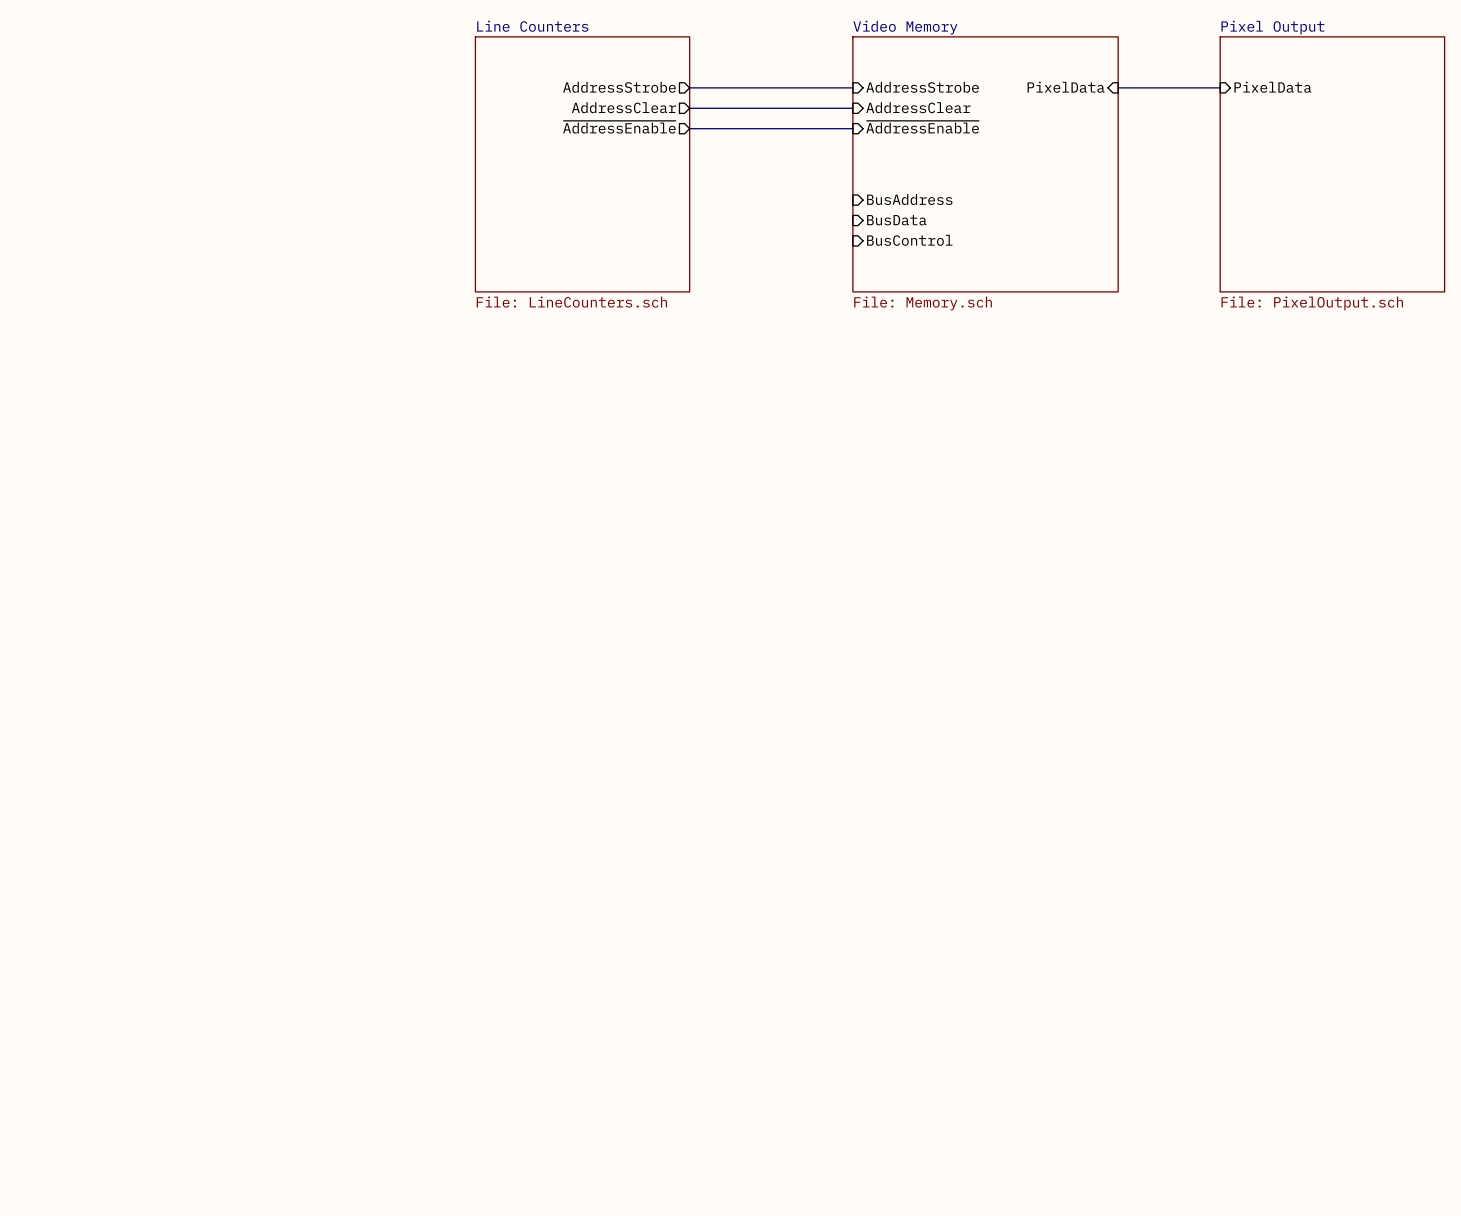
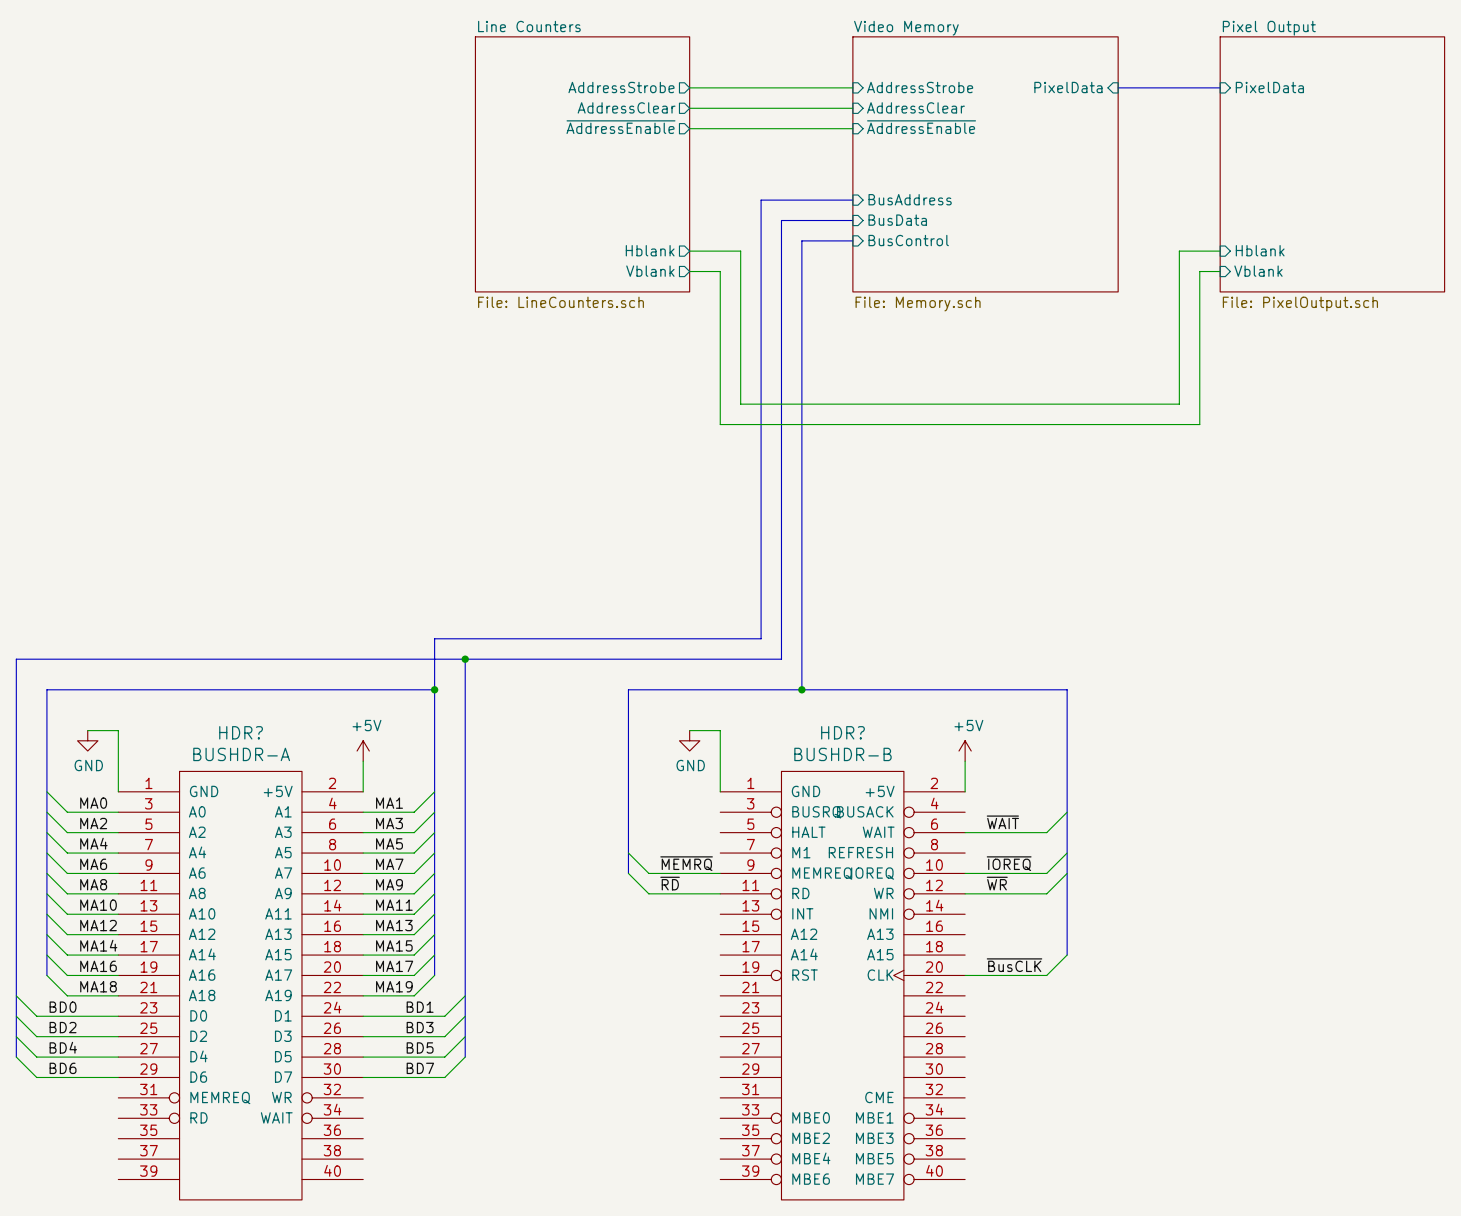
bus: none -> (852, 200) (761, 200) (761, 638) (434, 638) (434, 975)
bus: none -> (852, 220) (781, 220) (781, 659) (16, 659) (16, 1057)
bus: none -> (852, 240) (801, 240) (801, 689)
sheet pin: none -> Hblank (650, 250)
sheet pin: none -> Hblank (1260, 250)
wire: none -> (689, 251) (740, 251) (740, 404) (1179, 404) (1179, 251) (1220, 251)
sheet pin: none -> Vblank (650, 271)
sheet pin: none -> Vblank (1258, 271)
wire: none -> (689, 271) (720, 271) (720, 424) (1199, 424) (1199, 271) (1220, 271)
bus: none -> (465, 659) (465, 1057)
junction: none -> (465, 659)
bus: none -> (434, 689) (46, 689) (46, 975)
junction: none -> (434, 689)
junction: none -> (801, 689)
wire: none -> (87, 730) (118, 730) (118, 791)
wire: none -> (689, 730) (720, 730) (720, 791)
power symbol: none -> GND (87, 740)
power symbol: none -> GND (689, 740)
power symbol: none -> +5V (363, 751)
power symbol: none -> +5V (965, 751)
wire: none -> (363, 761) (363, 791)
wire: none -> (965, 761) (965, 791)
wire: none -> (46, 791) (67, 812) (118, 812)
wire: none -> (434, 791) (414, 812) (363, 812)
label: none -> MA0 (93, 803)
label: none -> MA1 (389, 803)
wire: none -> (46, 812) (67, 832) (118, 832)
wire: none -> (434, 812) (414, 832) (363, 832)
wire: none -> (1067, 812) (1046, 832) (965, 832)
label: none -> ~{WAIT} (1002, 822)
label: none -> MA2 (93, 823)
label: none -> MA3 (389, 823)
wire: none -> (46, 832) (67, 853) (118, 853)
wire: none -> (434, 832) (414, 853) (363, 853)
label: none -> MA4 (93, 843)
label: none -> MA5 (389, 843)
wire: none -> (46, 853) (67, 873) (118, 873)
wire: none -> (434, 853) (414, 873) (363, 873)
wire: none -> (628, 853) (648, 873) (720, 873)
wire: none -> (1067, 853) (1046, 873) (965, 873)
label: none -> MA6 (93, 864)
label: none -> MA7 (389, 864)
label: none -> ~{MEMRQ} (686, 863)
label: none -> ~{IOREQ} (1009, 863)
wire: none -> (46, 873) (67, 893) (118, 893)
wire: none -> (434, 873) (414, 893) (363, 893)
wire: none -> (628, 873) (648, 893) (720, 893)
bus: none -> (628, 873) (628, 689) (1067, 689) (1067, 955)
wire: none -> (1067, 873) (1046, 893) (965, 893)
label: none -> ~{RD} (670, 883)
label: none -> ~{WR} (997, 883)
label: none -> MA8 (93, 884)
label: none -> MA9 (389, 884)
wire: none -> (46, 893) (67, 914) (118, 914)
wire: none -> (434, 893) (414, 914) (363, 914)
label: none -> MA10 (98, 905)
label: none -> MA11 (394, 905)
wire: none -> (46, 914) (67, 934) (118, 934)
wire: none -> (434, 914) (414, 934) (363, 934)
label: none -> MA12 (98, 925)
label: none -> MA13 (394, 925)
wire: none -> (46, 934) (67, 955) (118, 955)
wire: none -> (434, 934) (414, 955) (363, 955)
label: none -> MA14 (98, 945)
label: none -> MA15 (394, 945)
wire: none -> (46, 955) (67, 975) (118, 975)
wire: none -> (434, 955) (414, 975) (363, 975)
wire: none -> (1067, 955) (1046, 975) (965, 975)
label: none -> ~{BusCLK} (1014, 965)
label: none -> MA16 (98, 966)
label: none -> MA17 (394, 966)
wire: none -> (46, 975) (67, 995) (118, 995)
wire: none -> (434, 975) (414, 995) (363, 995)
HDR?: none -> BUSHDR-A (240, 985)
HDR?: none -> BUSHDR-B (842, 985)
label: none -> MA18 (98, 986)
label: none -> MA19 (394, 986)
wire: none -> (16, 995) (36, 1016) (118, 1016)
wire: none -> (465, 995) (444, 1016) (363, 1016)
label: none -> BD0 (63, 1007)
label: none -> BD1 (420, 1007)
wire: none -> (16, 1016) (36, 1036) (118, 1036)
wire: none -> (465, 1016) (444, 1036) (363, 1036)
label: none -> BD2 (63, 1027)
label: none -> BD3 (420, 1027)
wire: none -> (16, 1036) (36, 1057) (118, 1057)
wire: none -> (465, 1036) (444, 1057) (363, 1057)
label: none -> BD4 (63, 1047)
label: none -> BD5 (420, 1047)
wire: none -> (16, 1057) (36, 1077) (118, 1077)
wire: none -> (465, 1057) (444, 1077) (363, 1077)
label: none -> BD6 (63, 1068)
label: none -> BD7 (420, 1068)

